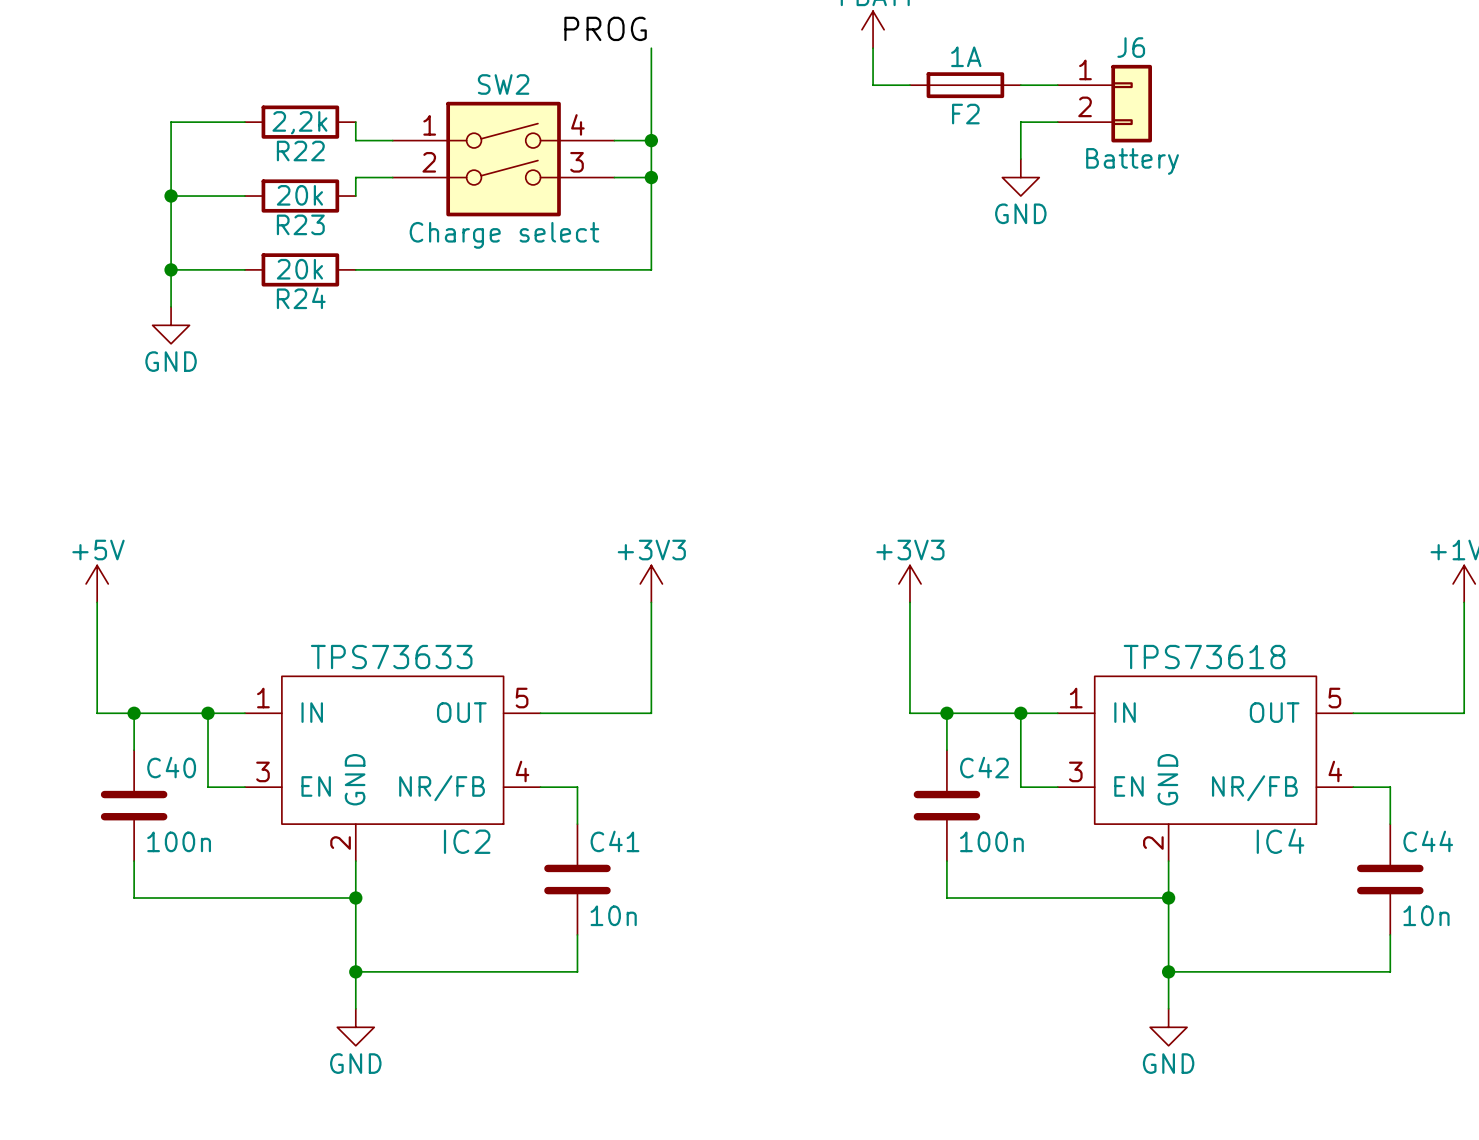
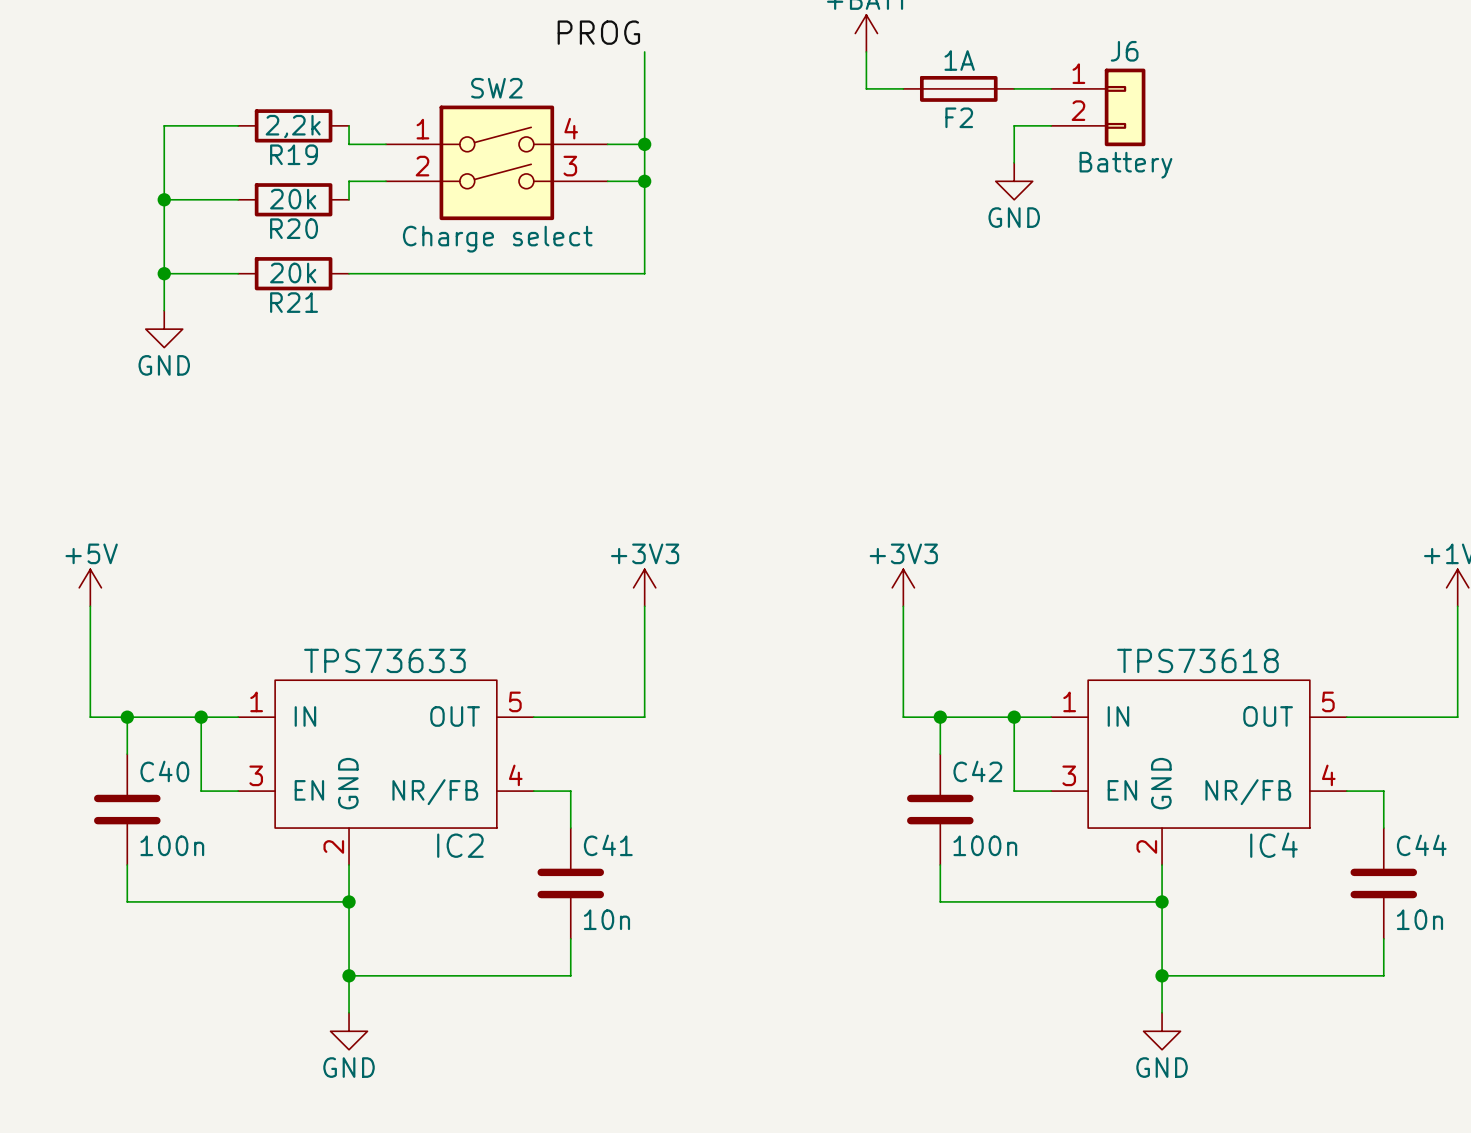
R22 name: R22 (300, 150) -> R19 (294, 154)
R23 name: R23 (300, 224) -> R20 (294, 228)
R24 name: R24 (301, 298) -> R21 (294, 302)

